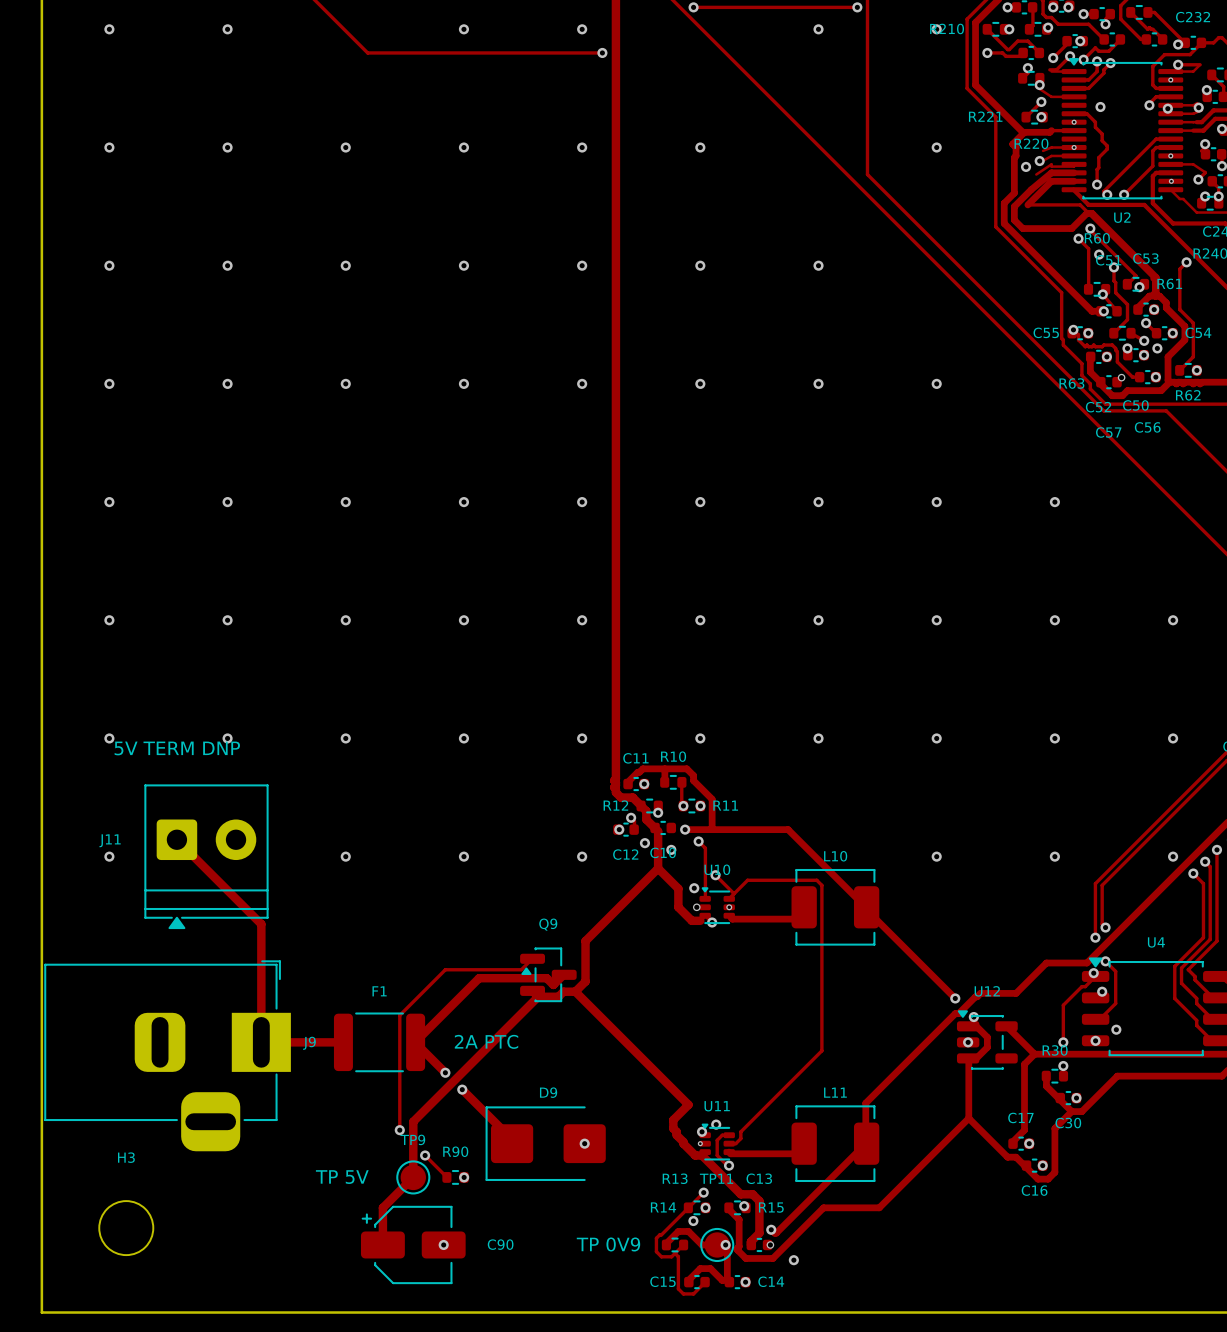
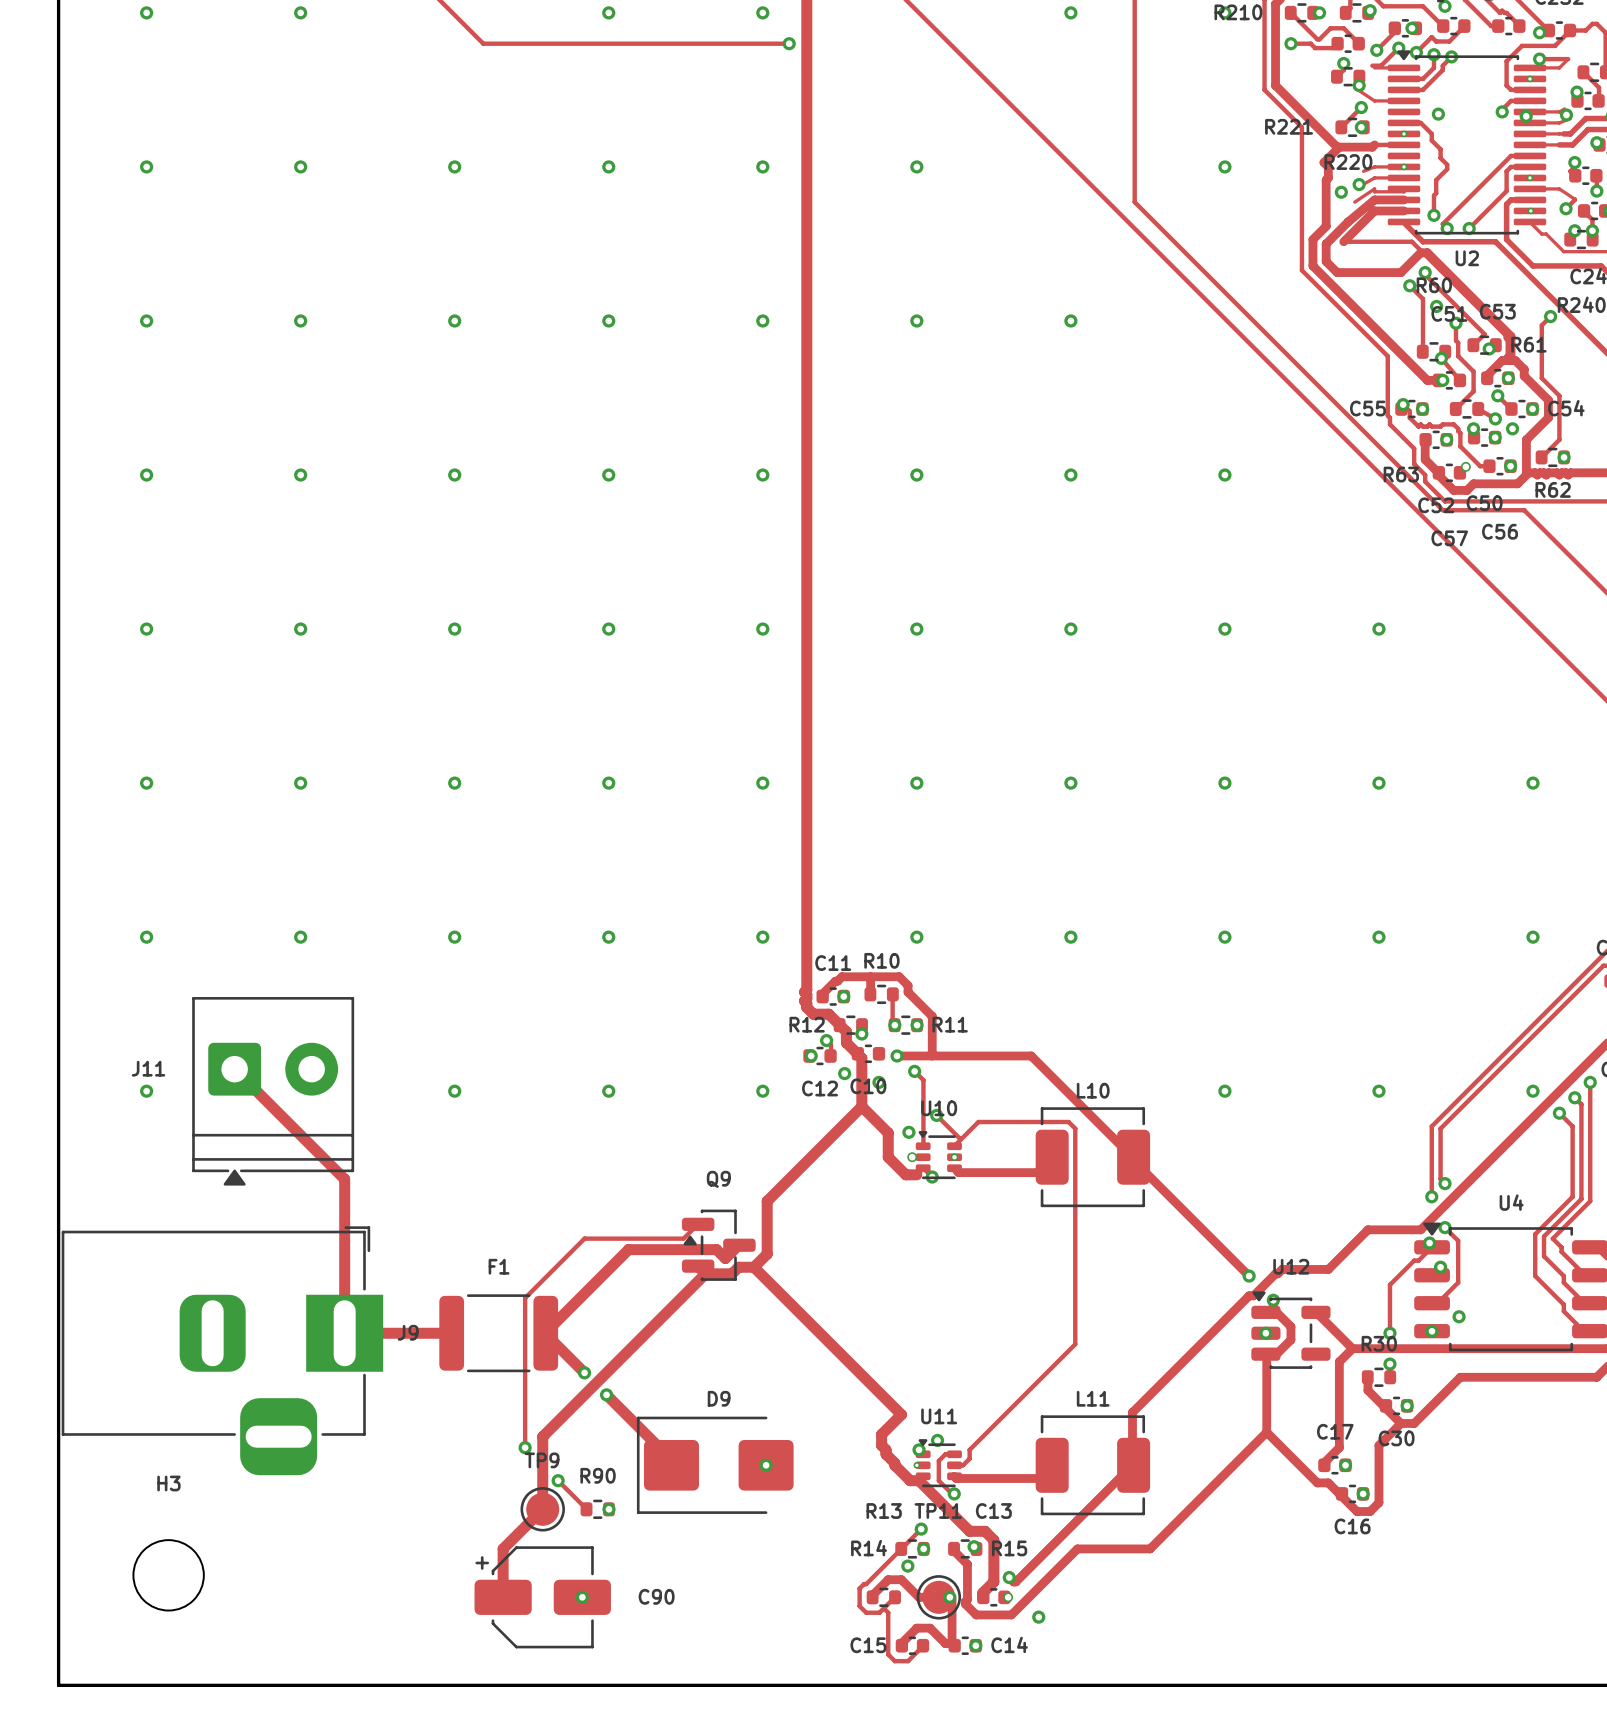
text: 5V TERM DNP (177, 748) -> none
text: 2A PTC (486, 1041) -> none
text: TP 5V (342, 1177) -> none
text: TP 0V9 (608, 1244) -> none

